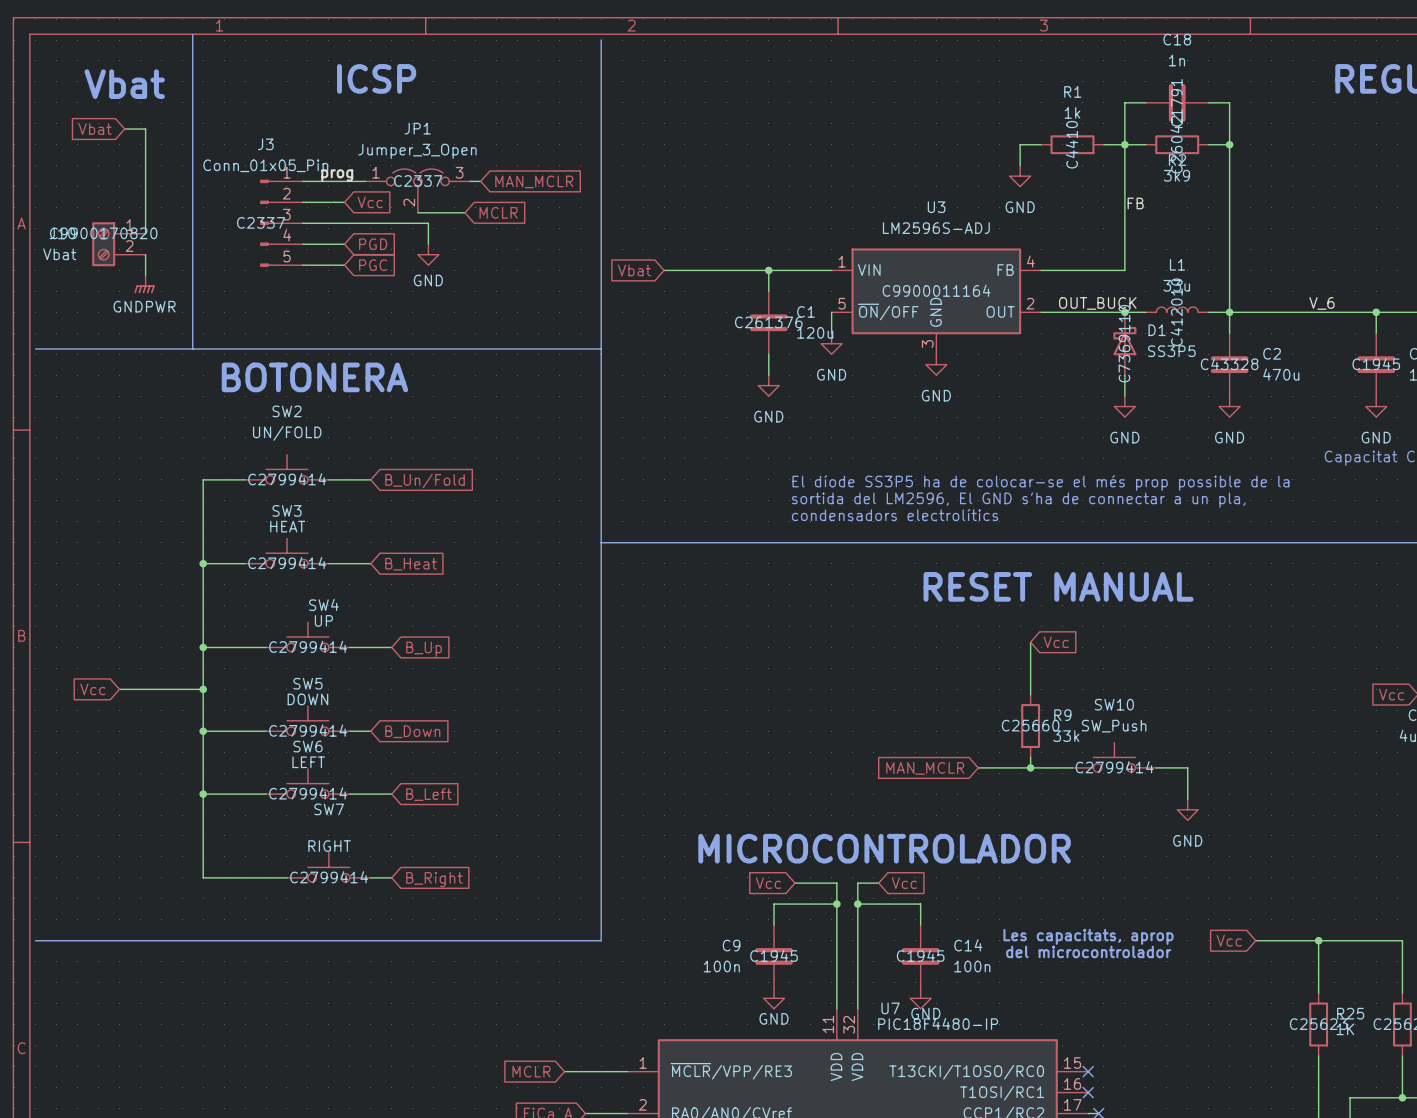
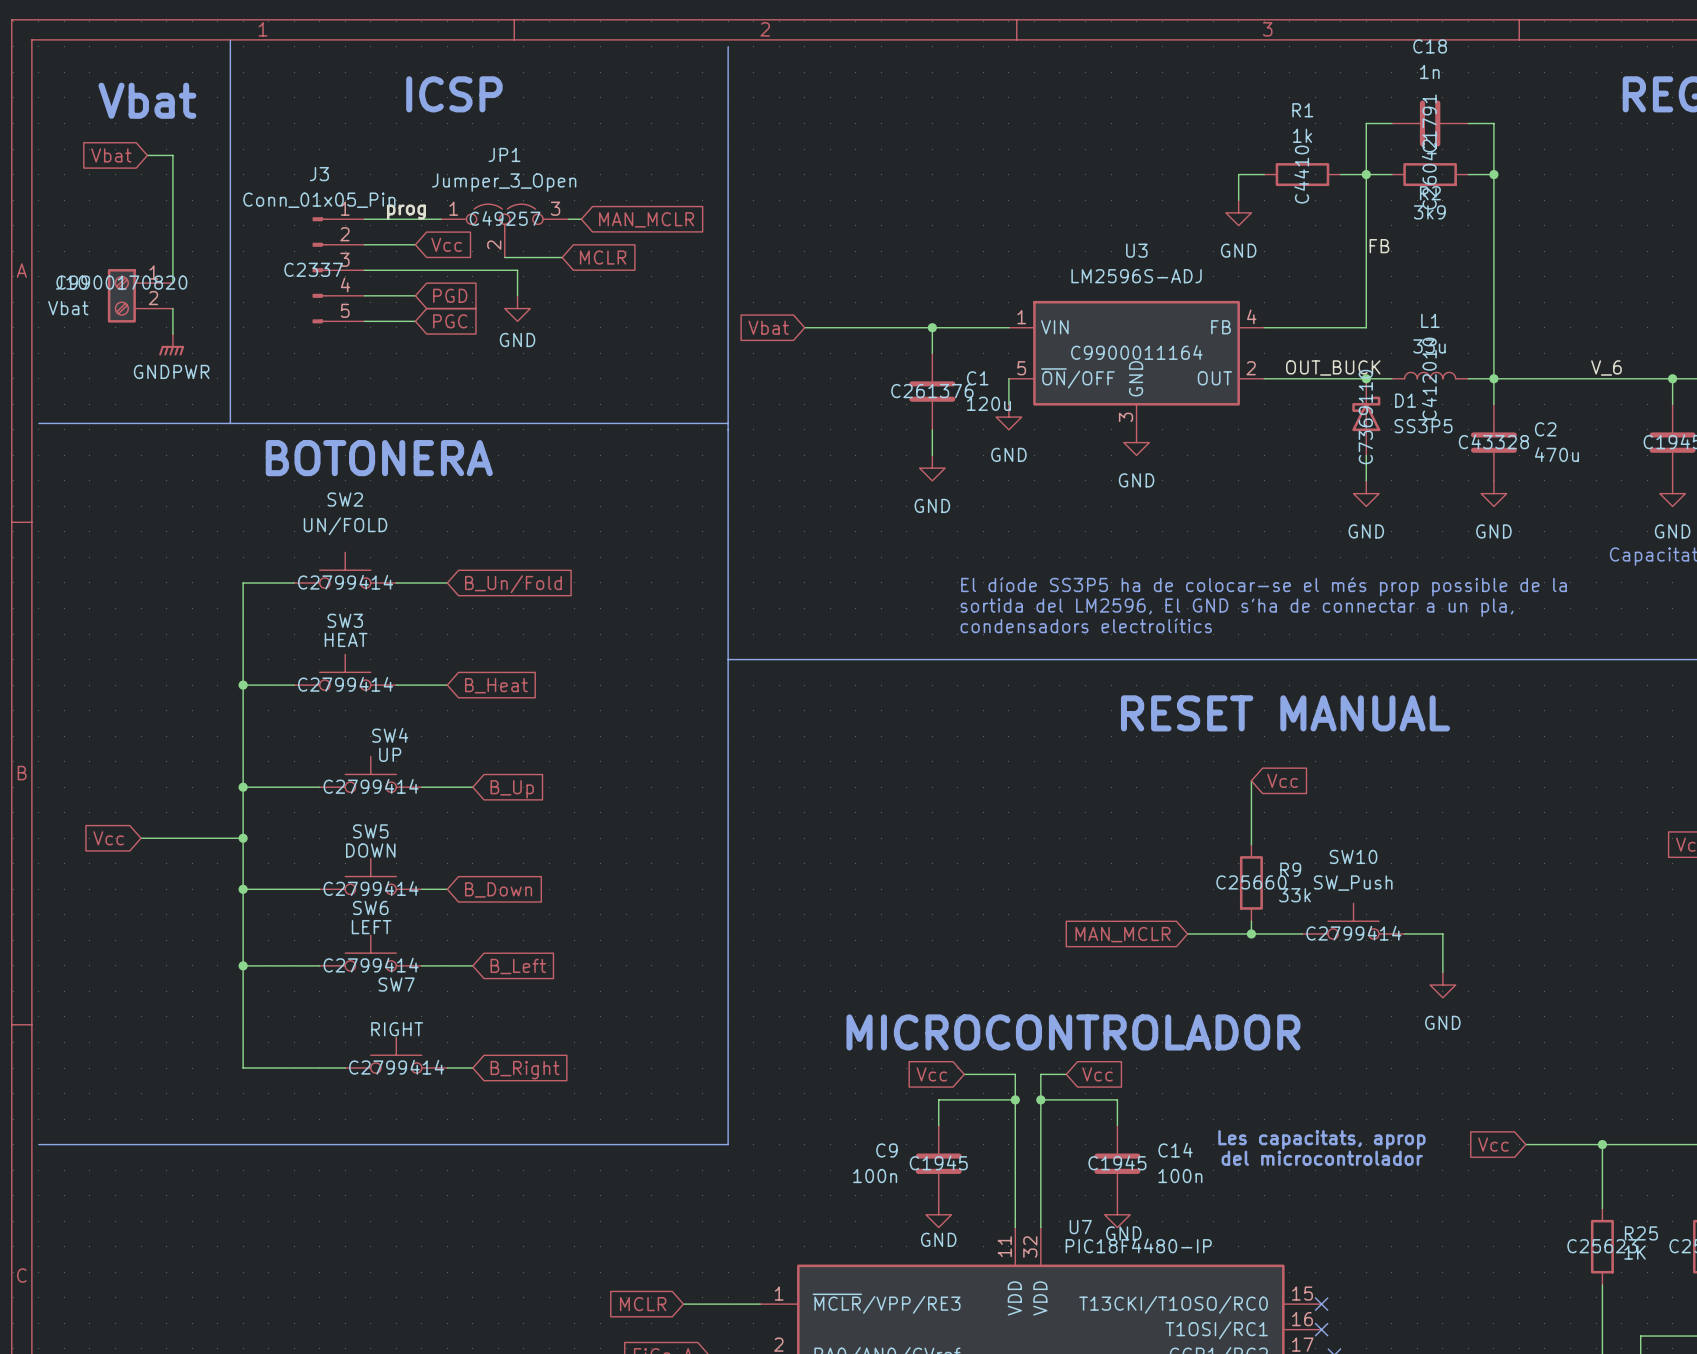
JP1 text: C2337 (418, 181) -> C49257 (505, 218)

